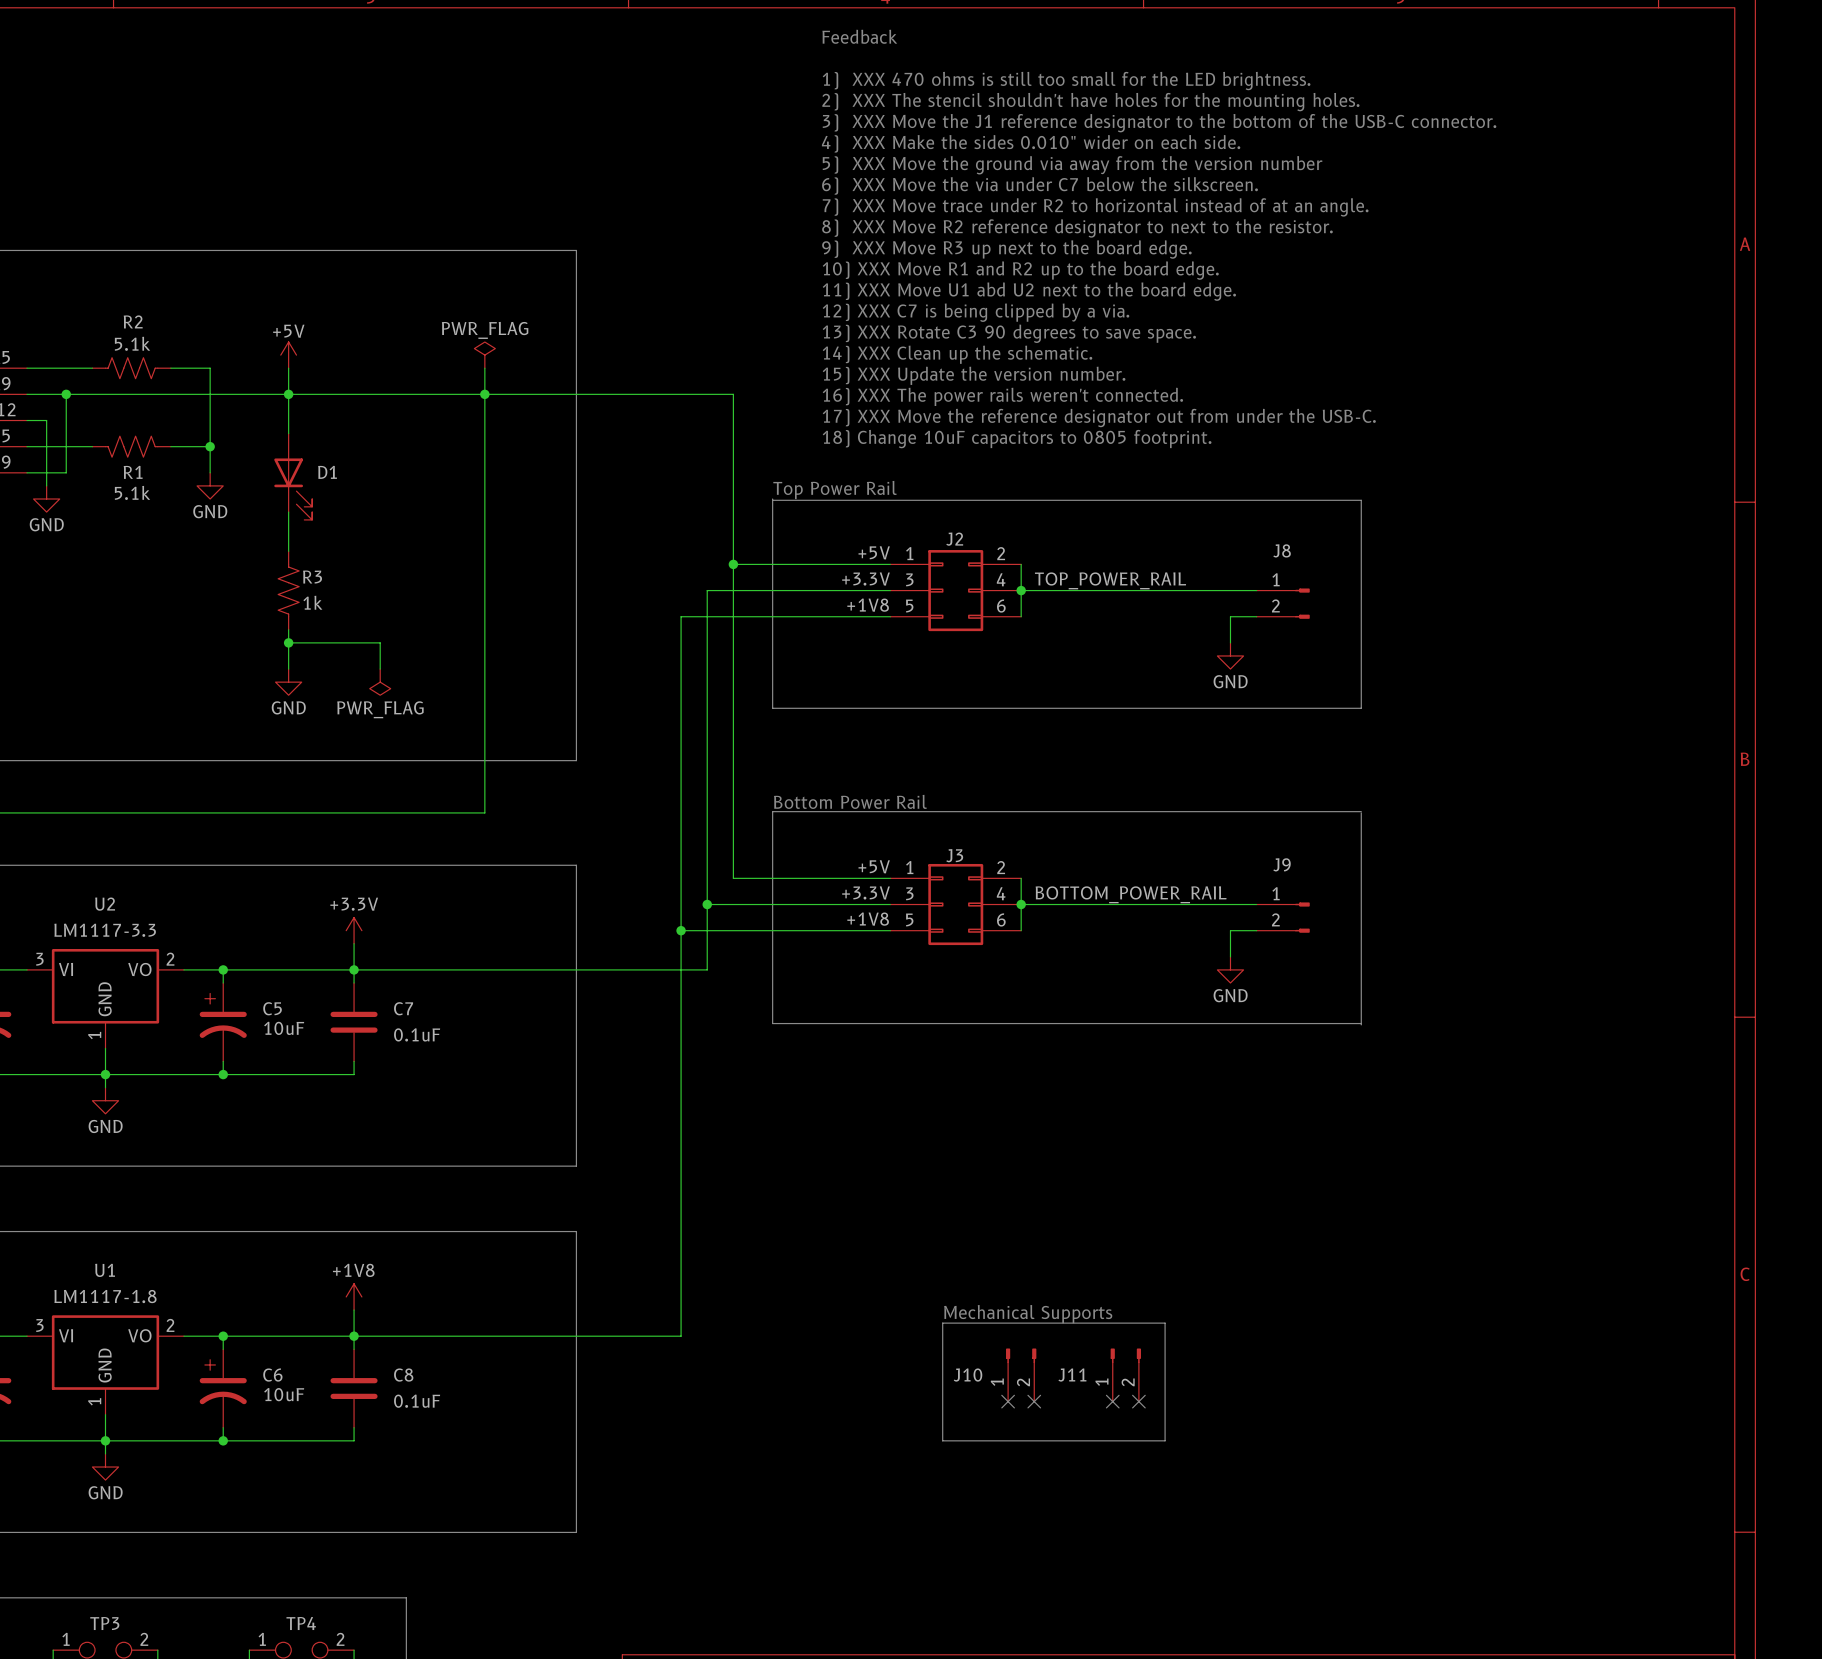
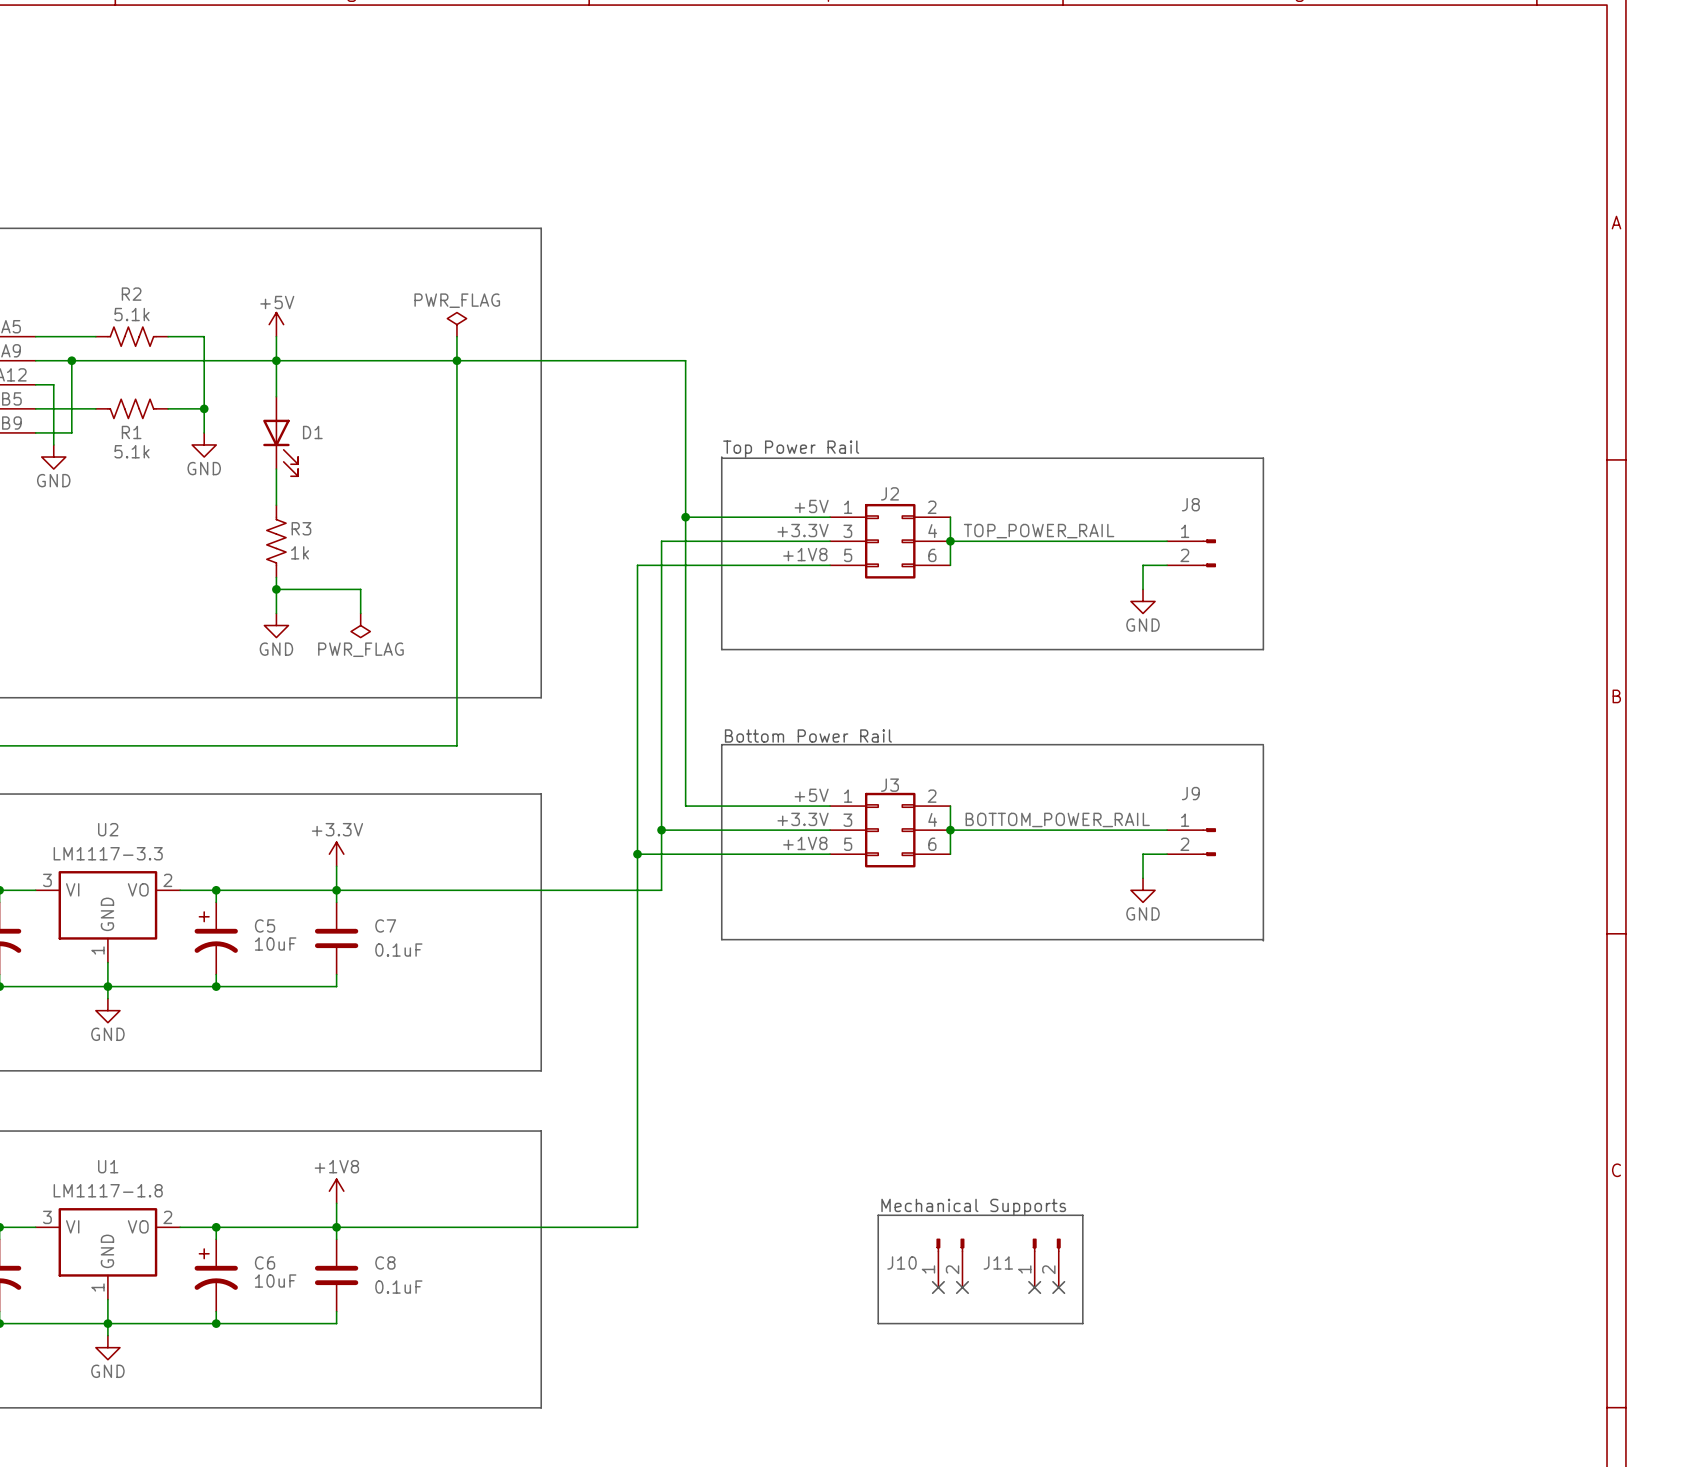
text: Feedback (859, 36) -> none
text: 1) XXX 470 ohms is still too small for the LED brightness. (1066, 81) -> none
text: 2) XXX The stencil shouldn't have holes for the mounting holes. (1090, 102) -> none
text: 3) XXX Move the J1 reference designator to the bottom of the USB-C connector. (1159, 123) -> none
text: 4) XXX Make the sides 0.010" wider on each side. (1031, 143) -> none
text: 5) XXX Move the ground via away from the version number (1072, 165) -> none
text: 6) XXX Move the via under C7 below the silkscreen. (1040, 185) -> none
text: 7) XXX Move trace under R2 to horizontal instead of at an angle. (1095, 207) -> none
text: 8) XXX Move R2 reference designator to next to the resistor. (1077, 228) -> none
text: 9) XXX Move R3 up next to the board edge. (1006, 249) -> none
text: 10) XXX Move R1 and R2 up to the board edge. (1020, 270) -> none
text: 11) XXX Move U1 abd U2 next to the board edge. (1029, 291) -> none
text: 12) XXX C7 is being clipped by a via. (976, 312) -> none
text: 13) XXX Rotate C3 90 degrees to save space. (1009, 333) -> none
text: 14) XXX Clean up the schematic. (957, 354) -> none
text: 15) XXX Update the version number. (974, 375) -> none
text: 16) XXX The power rails weren't connected. (1002, 396) -> none
text: 17) XXX Move the reference designator out from under the USB-C. (1099, 418) -> none
text: 18) Change 10uF capacitors to 0805 footprint. (1017, 439) -> none

